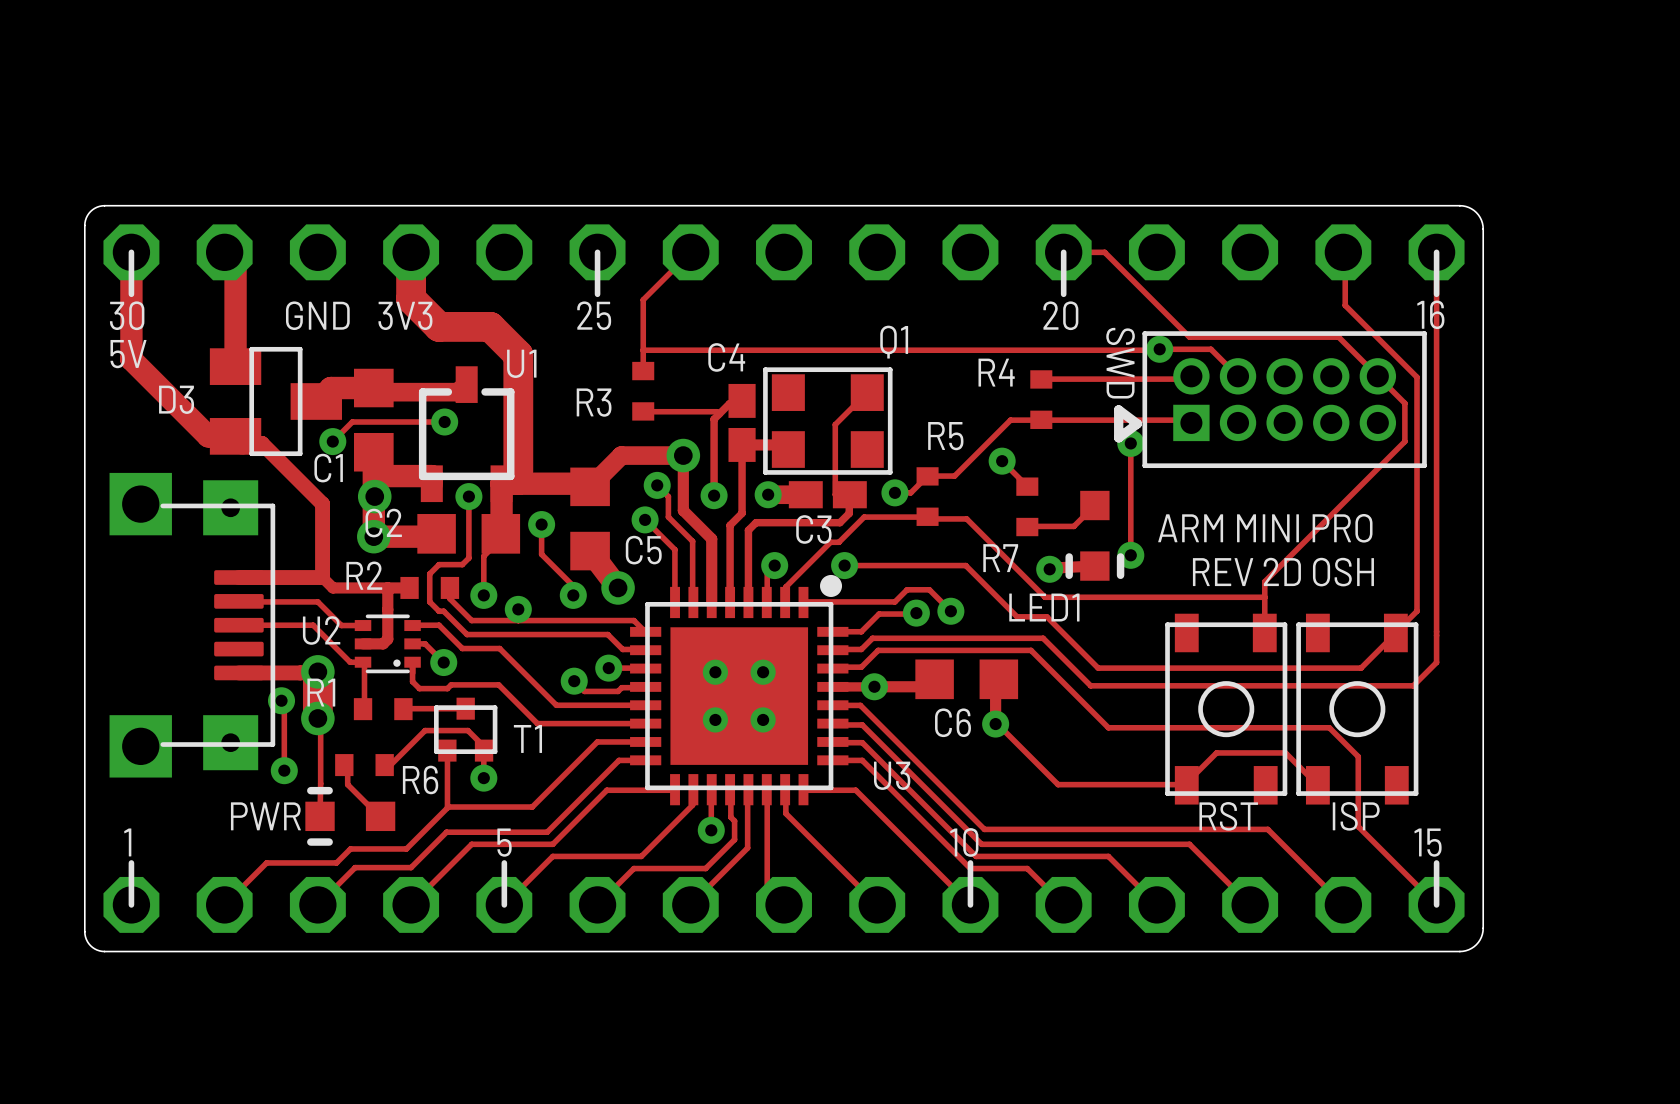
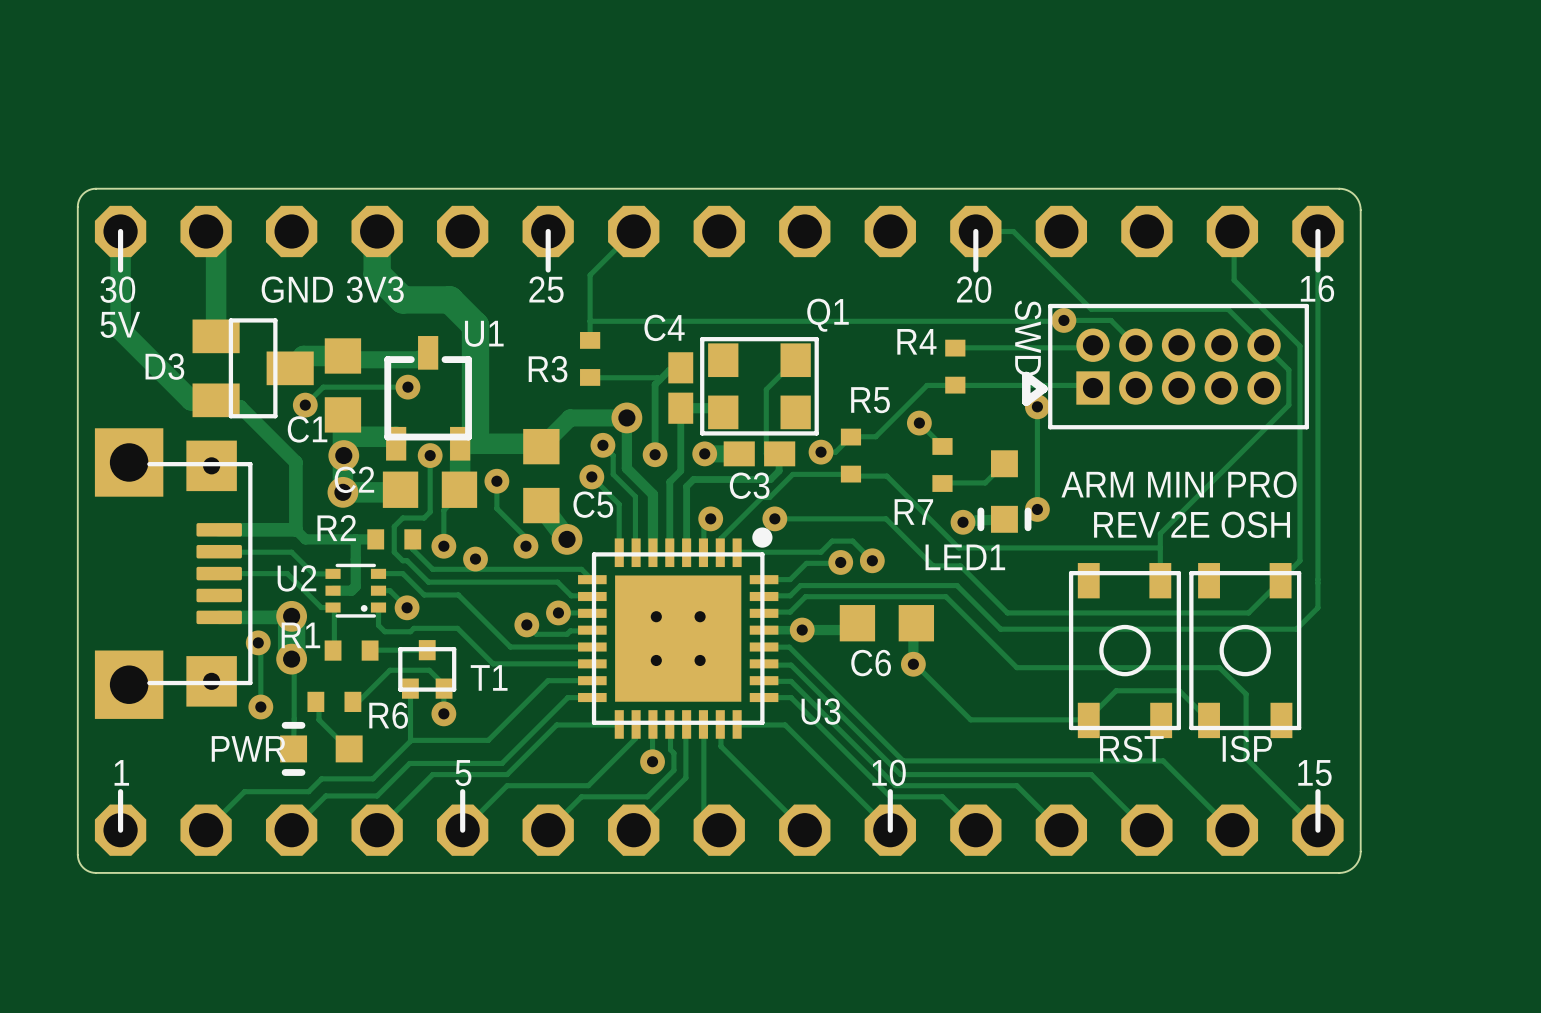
part footprint: [109, 472, 276, 778] -> [94, 428, 253, 719]
text: REV 2D OSH (1283, 572) -> REV 2E OSH (1192, 524)

